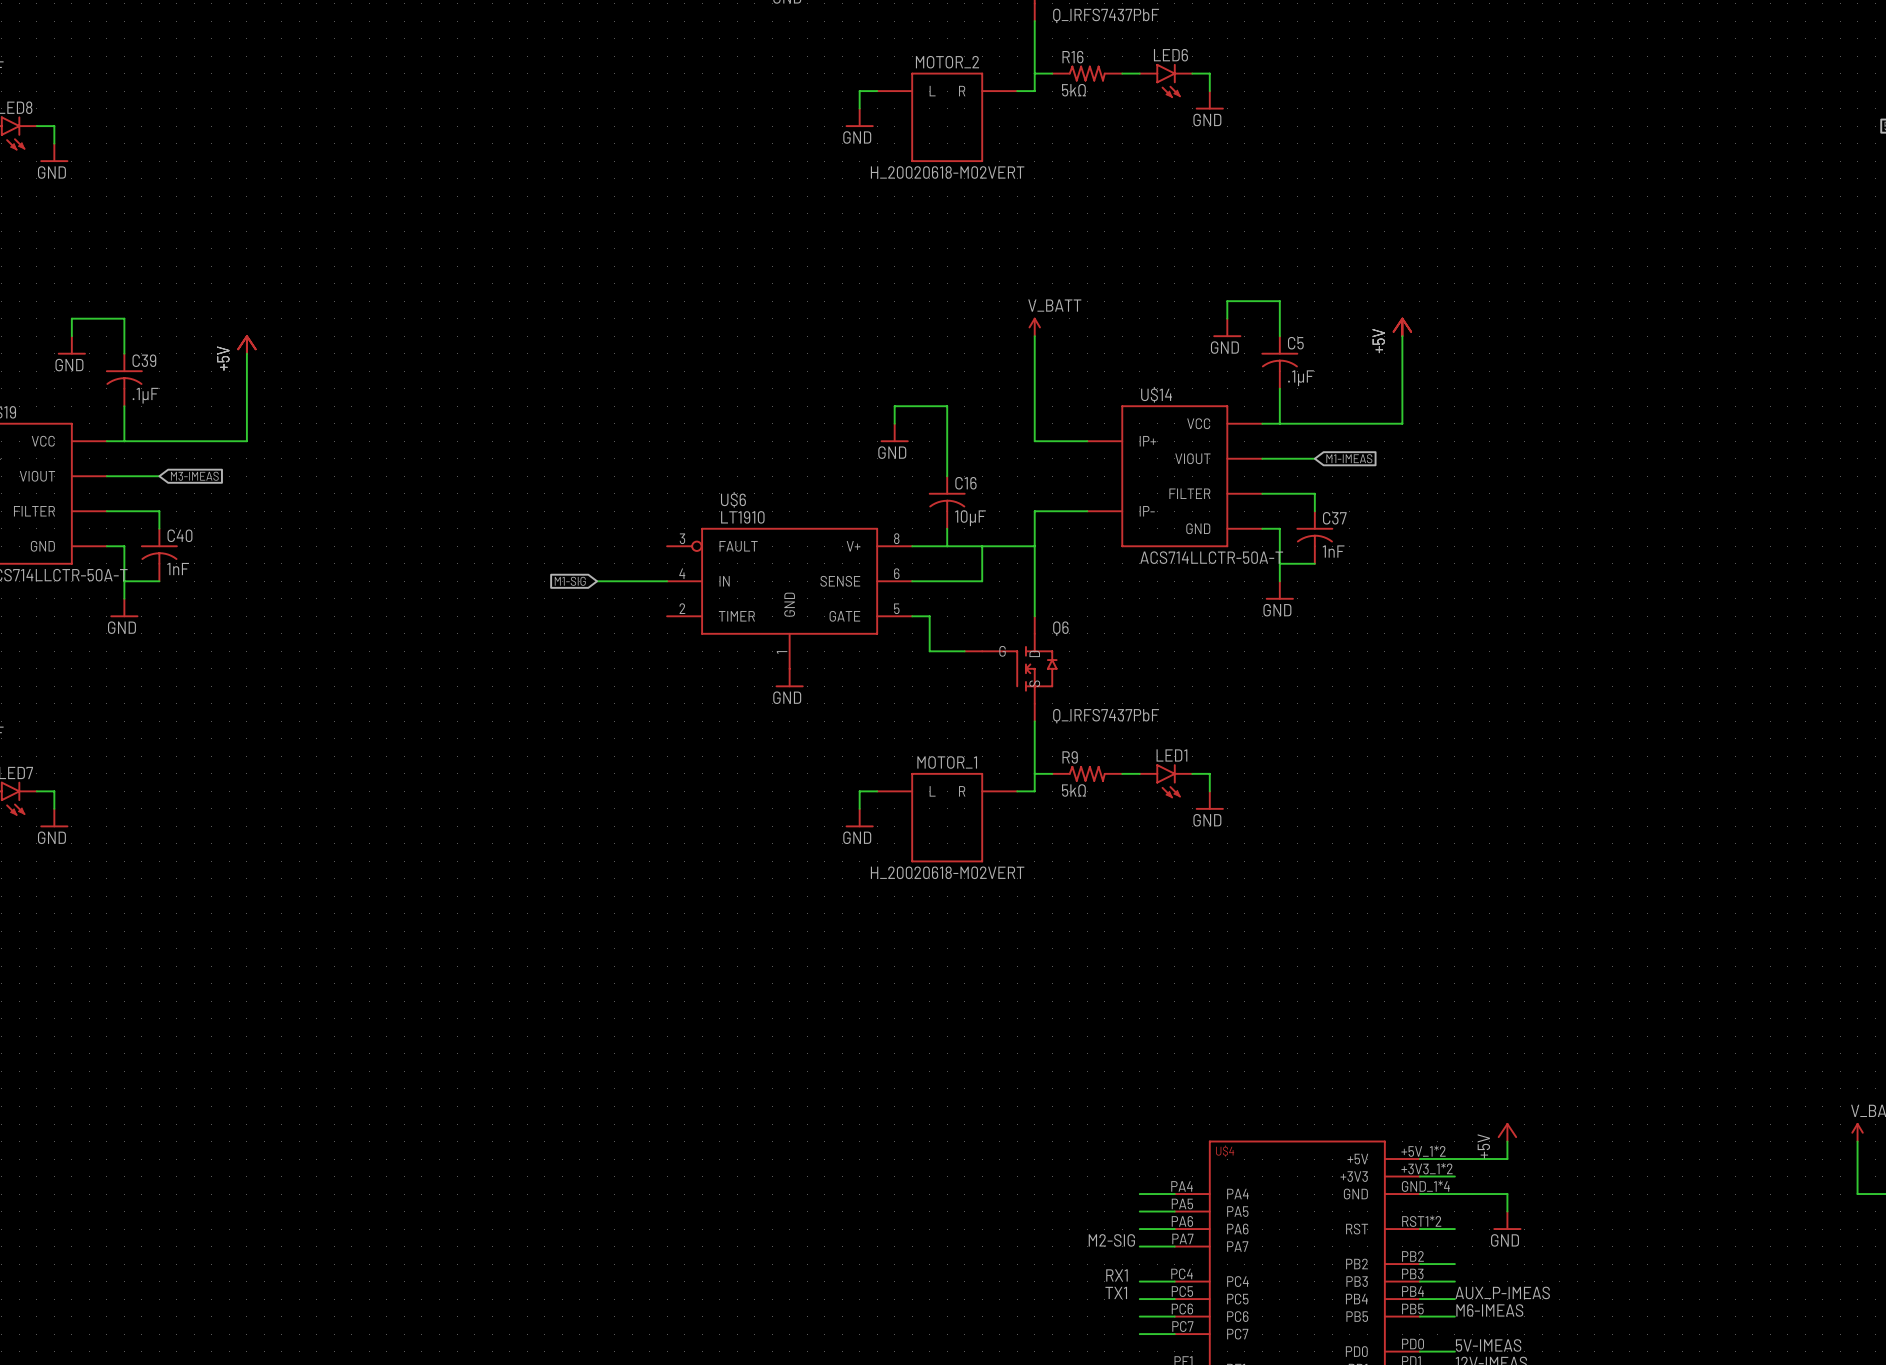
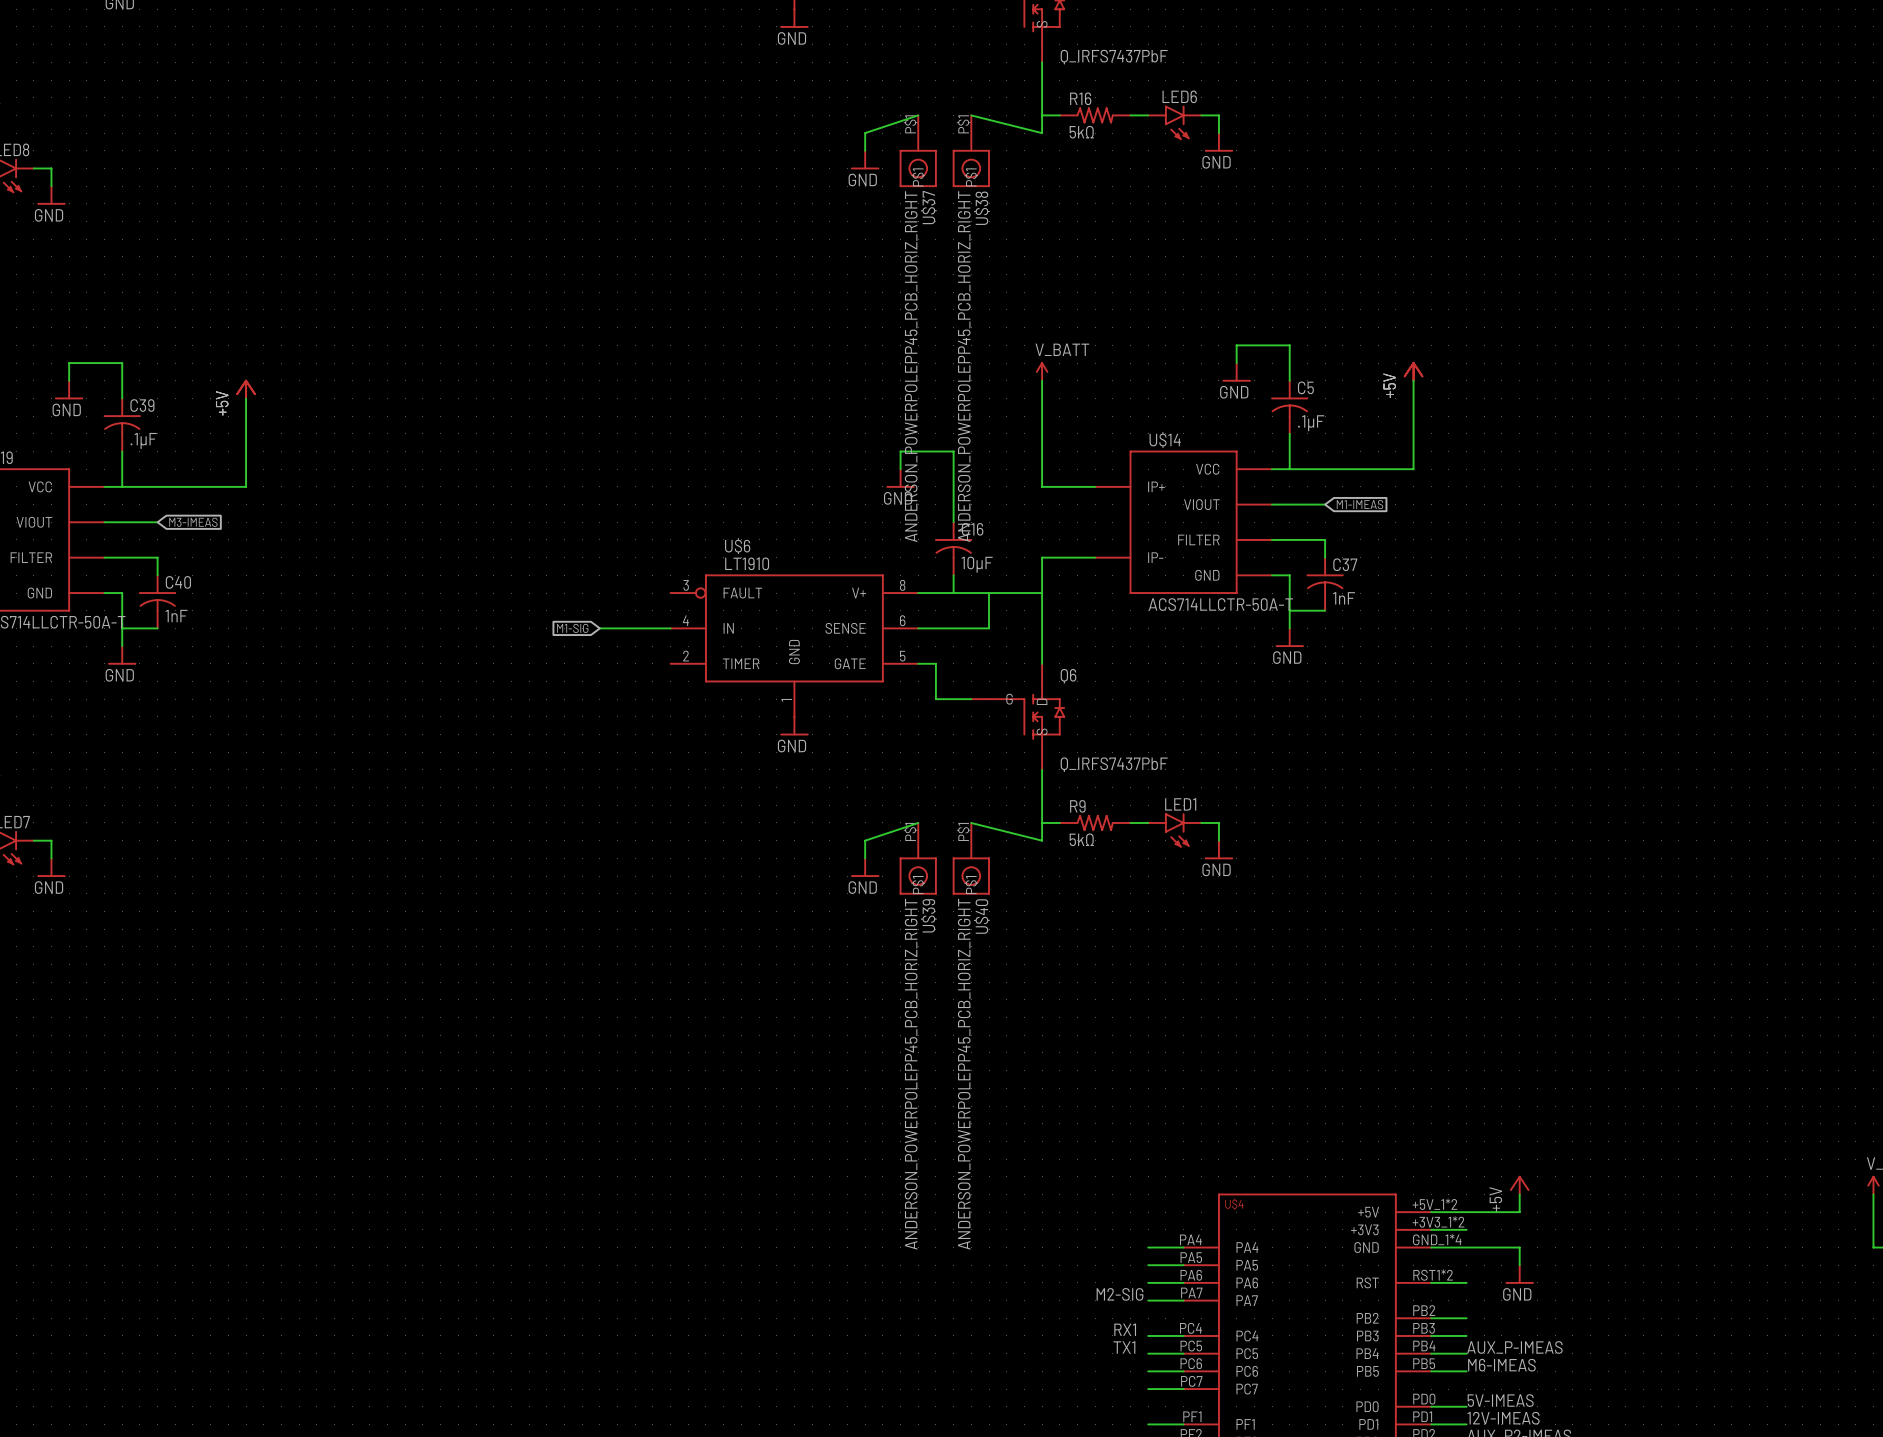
wire: (859, 91) (877, 91) -> (865, 133) (918, 115)
wire: (1017, 91) (1034, 91) -> (971, 115) (1042, 133)
U$37: none -> ANDERSON_POWERPOLEPP45_PCB_HORIZ_RIGHT (918, 151)
U$38: none -> ANDERSON_POWERPOLEPP45_PCB_HORIZ_RIGHT (971, 151)
MOTOR_2: H_20020618-M02VERT (947, 117) -> none
wire: (859, 791) (877, 791) -> (865, 840) (918, 822)
wire: (1017, 791) (1034, 791) -> (971, 822) (1042, 840)
U$39: none -> ANDERSON_POWERPOLEPP45_PCB_HORIZ_RIGHT (918, 858)
U$40: none -> ANDERSON_POWERPOLEPP45_PCB_HORIZ_RIGHT (971, 858)
MOTOR_1: H_20020618-M02VERT (947, 817) -> none

